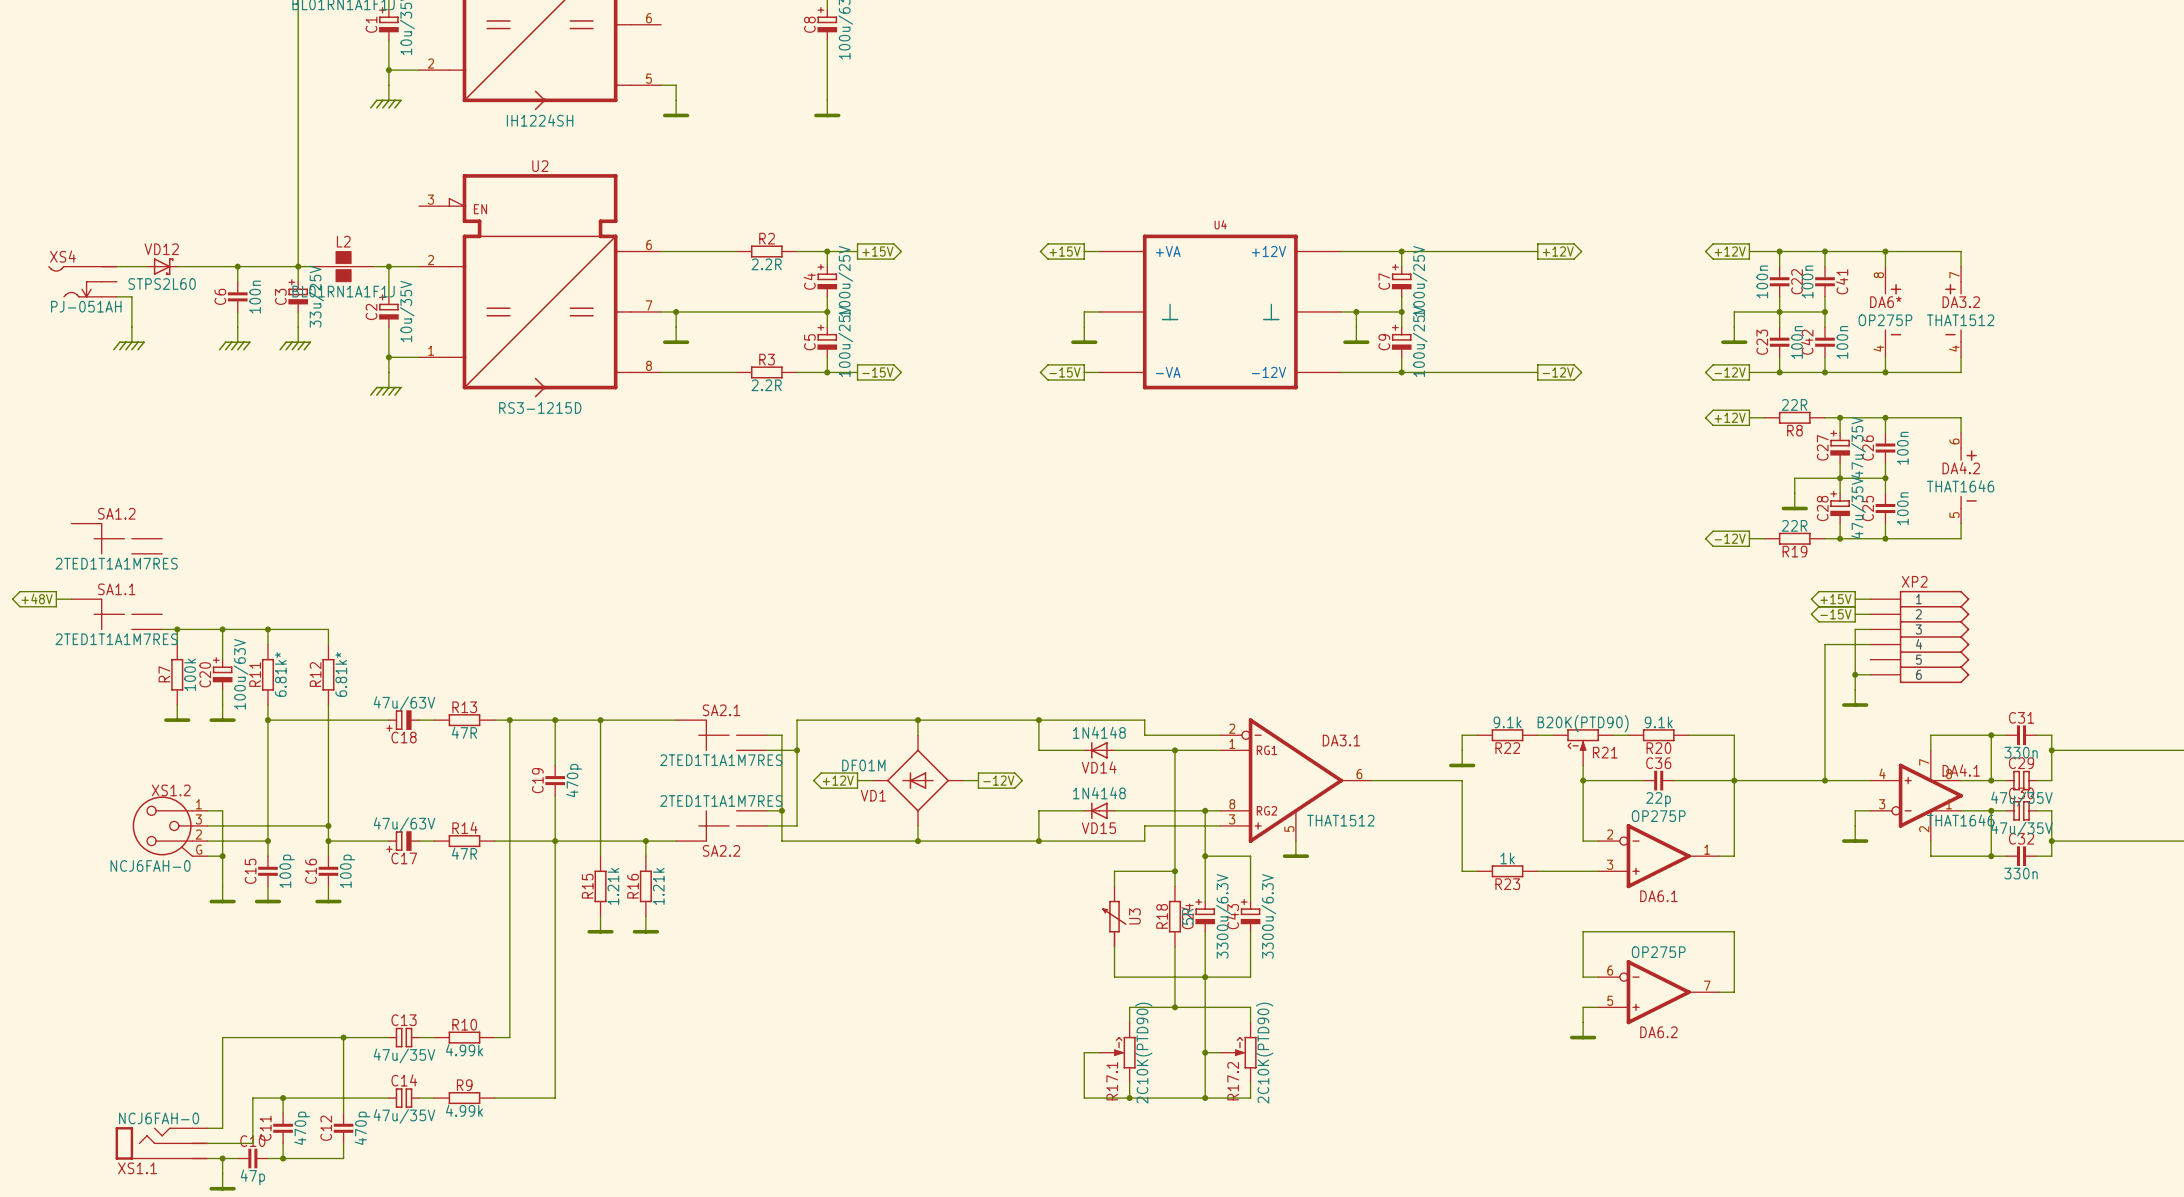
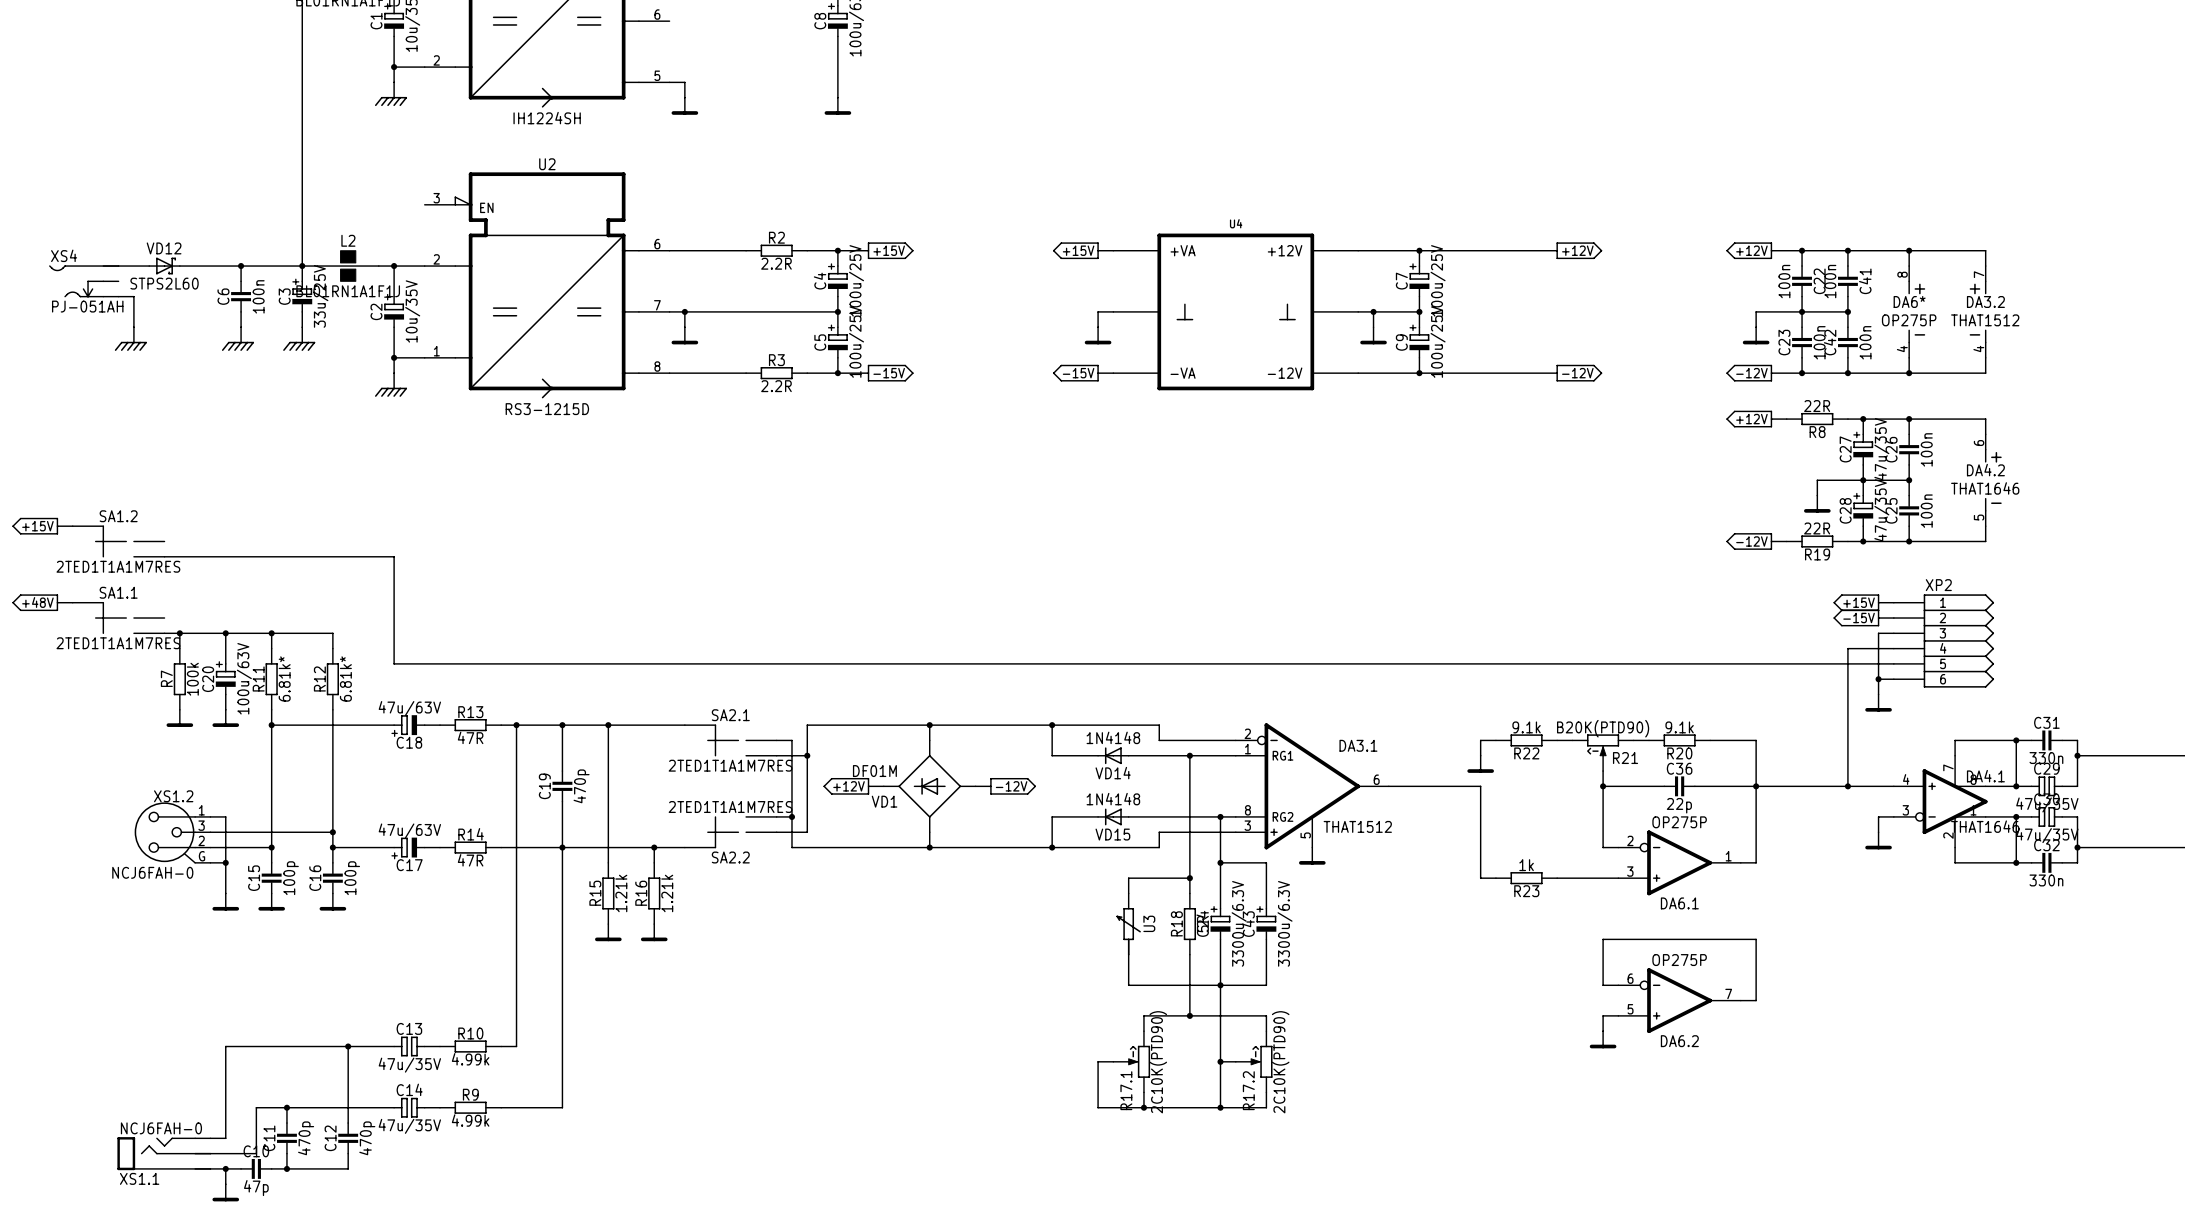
power symbol: none -> (35, 526)
wire: none -> (57, 526) (72, 526)
wire: none -> (164, 556) (394, 556) (394, 663) (1893, 663)

